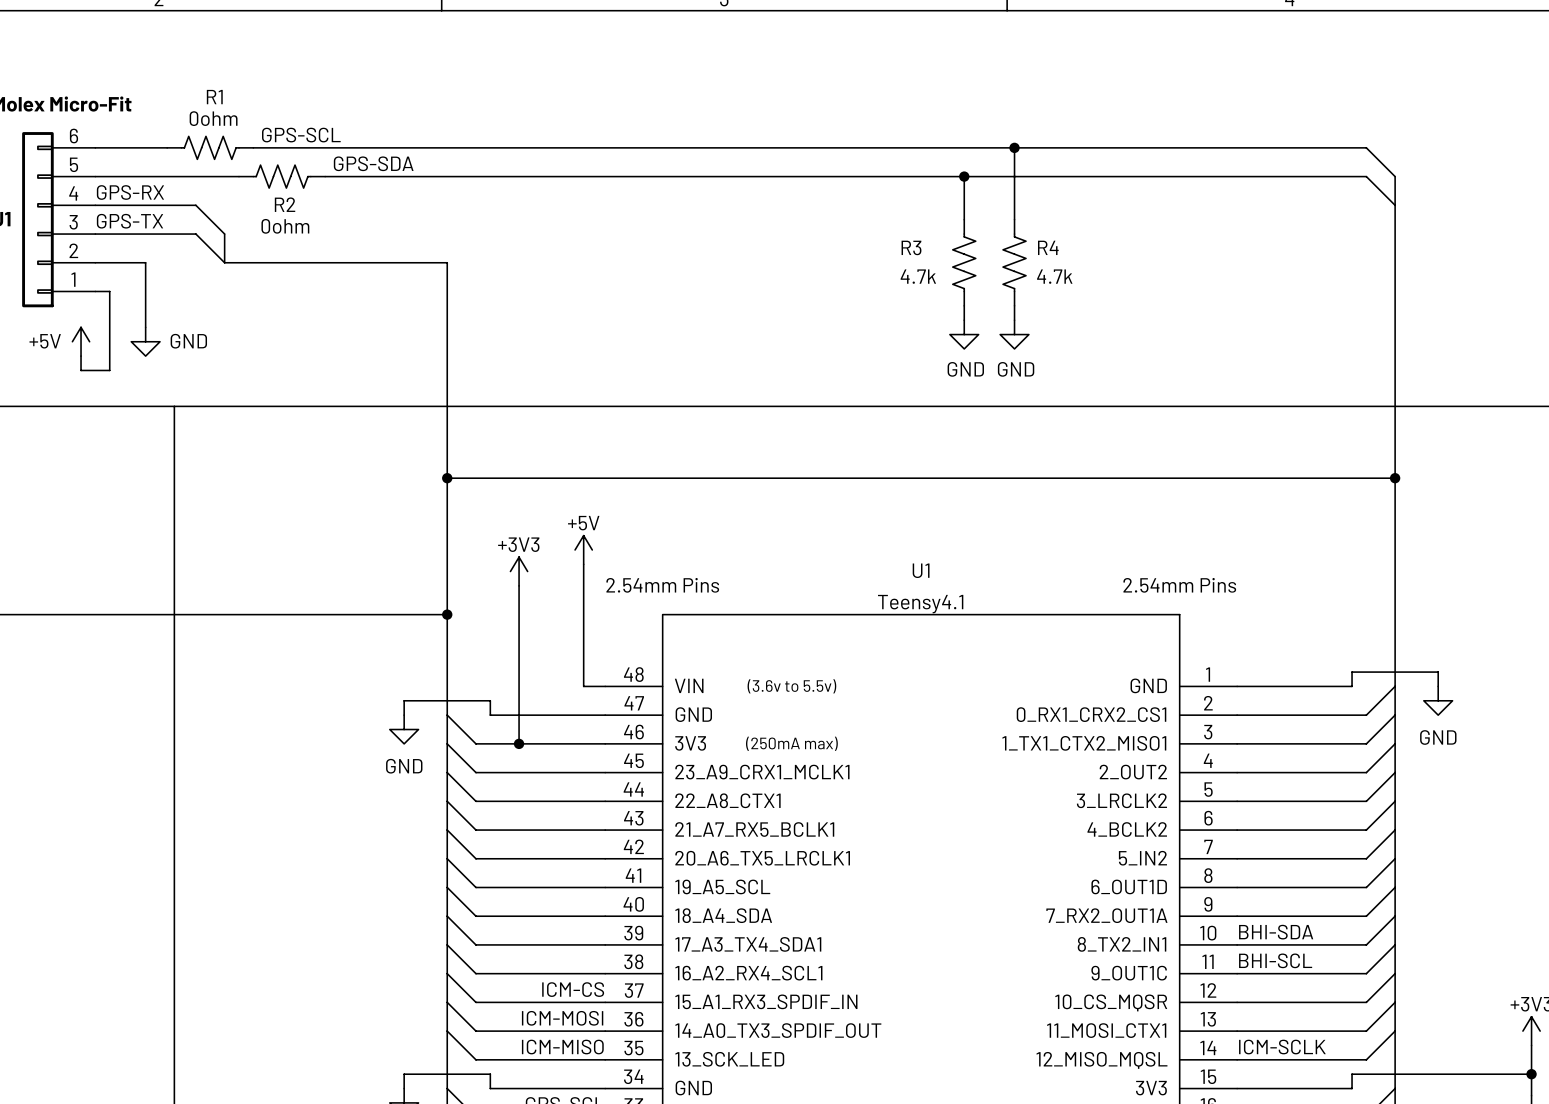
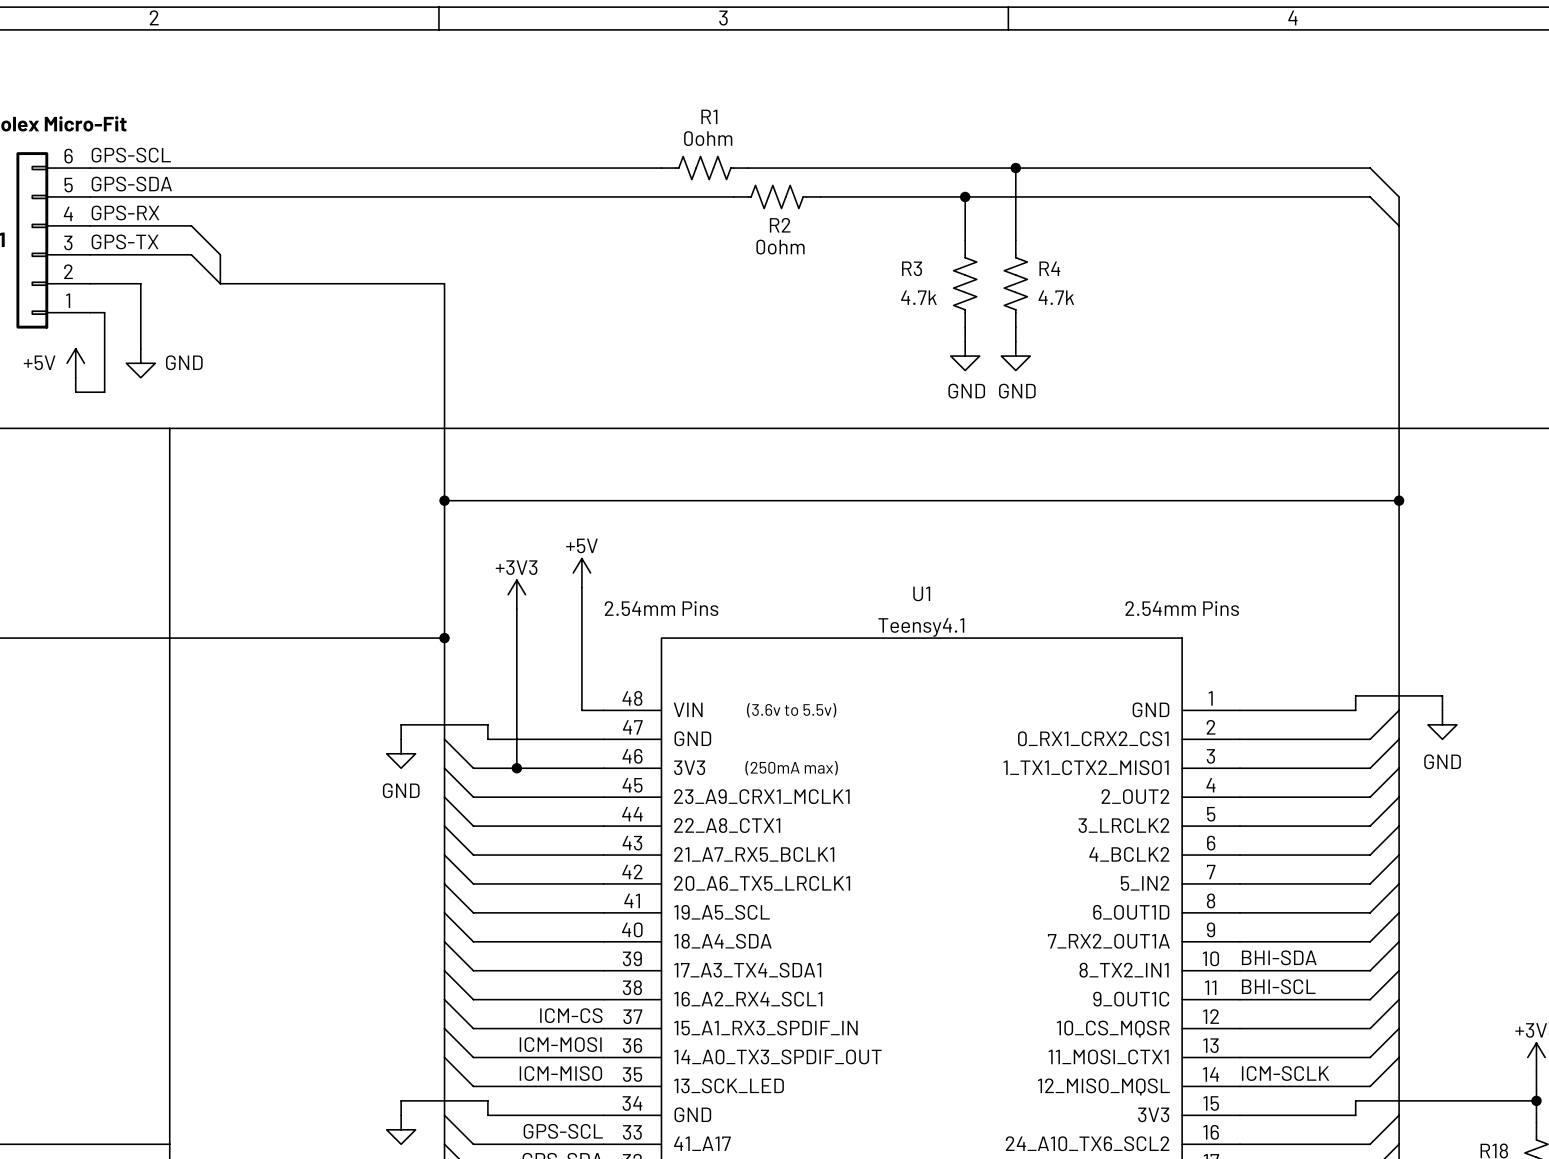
label position: GPS-SCL (301, 135) -> GPS-SCL (131, 155)
R1 position: (210, 147) -> (704, 168)
label position: GPS-SDA (373, 163) -> GPS-SDA (131, 184)
R2 position: (282, 176) -> (777, 196)

